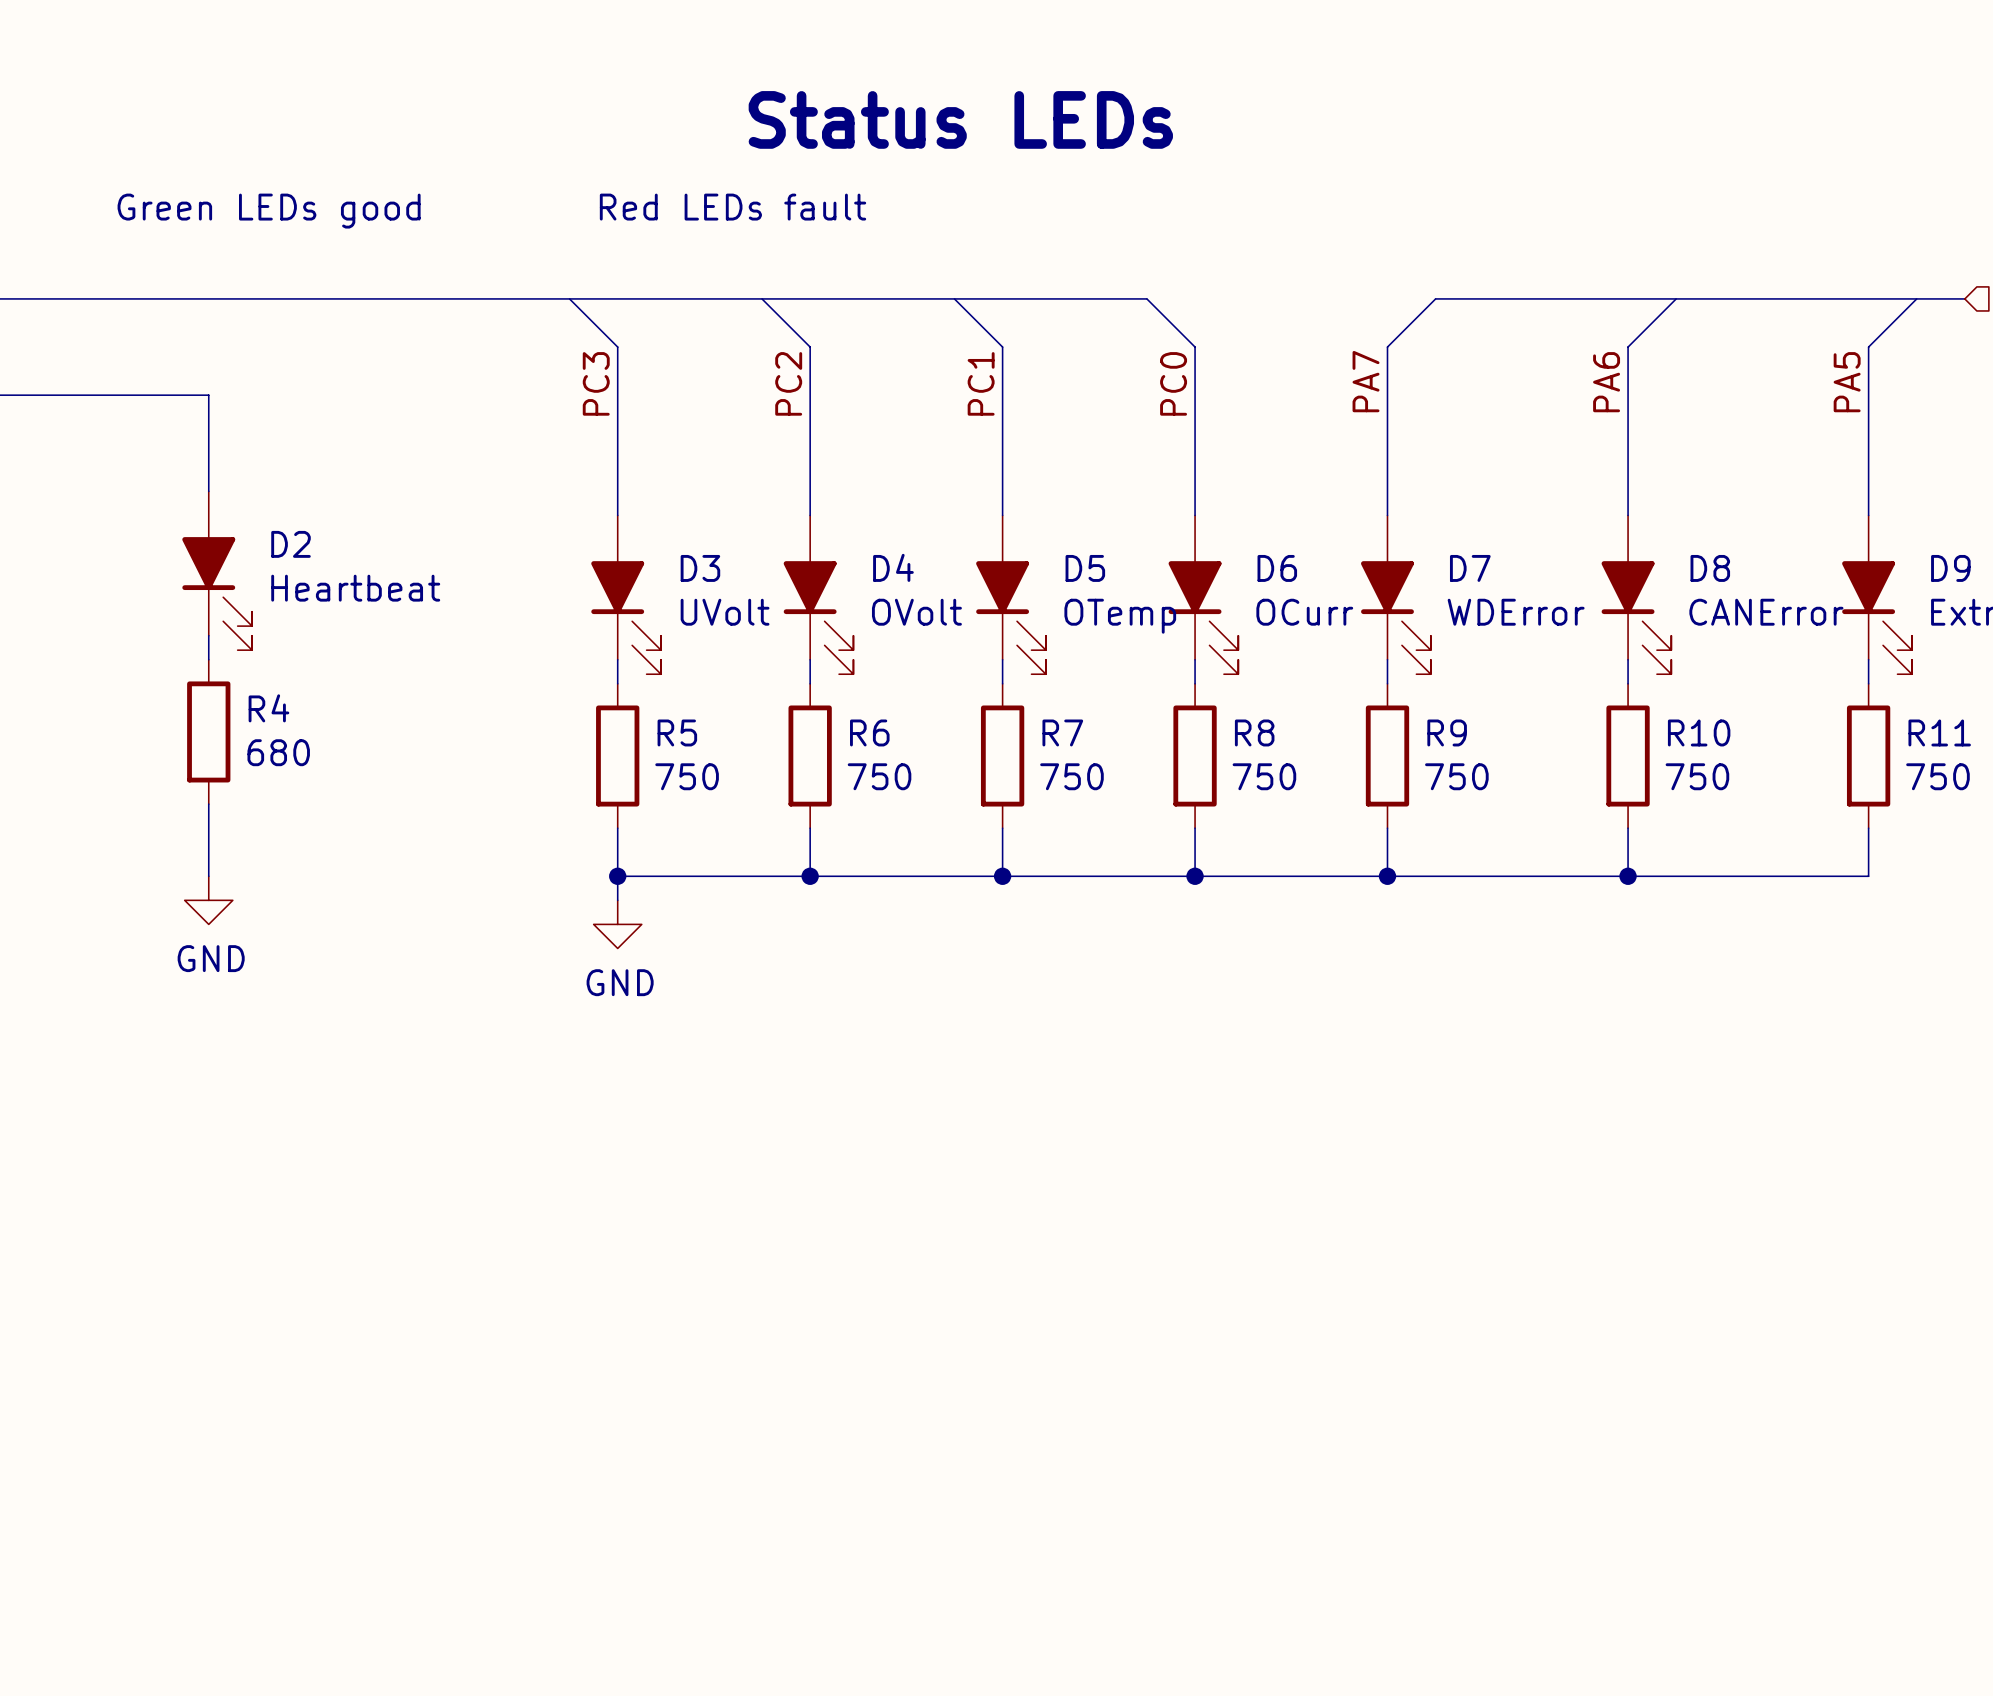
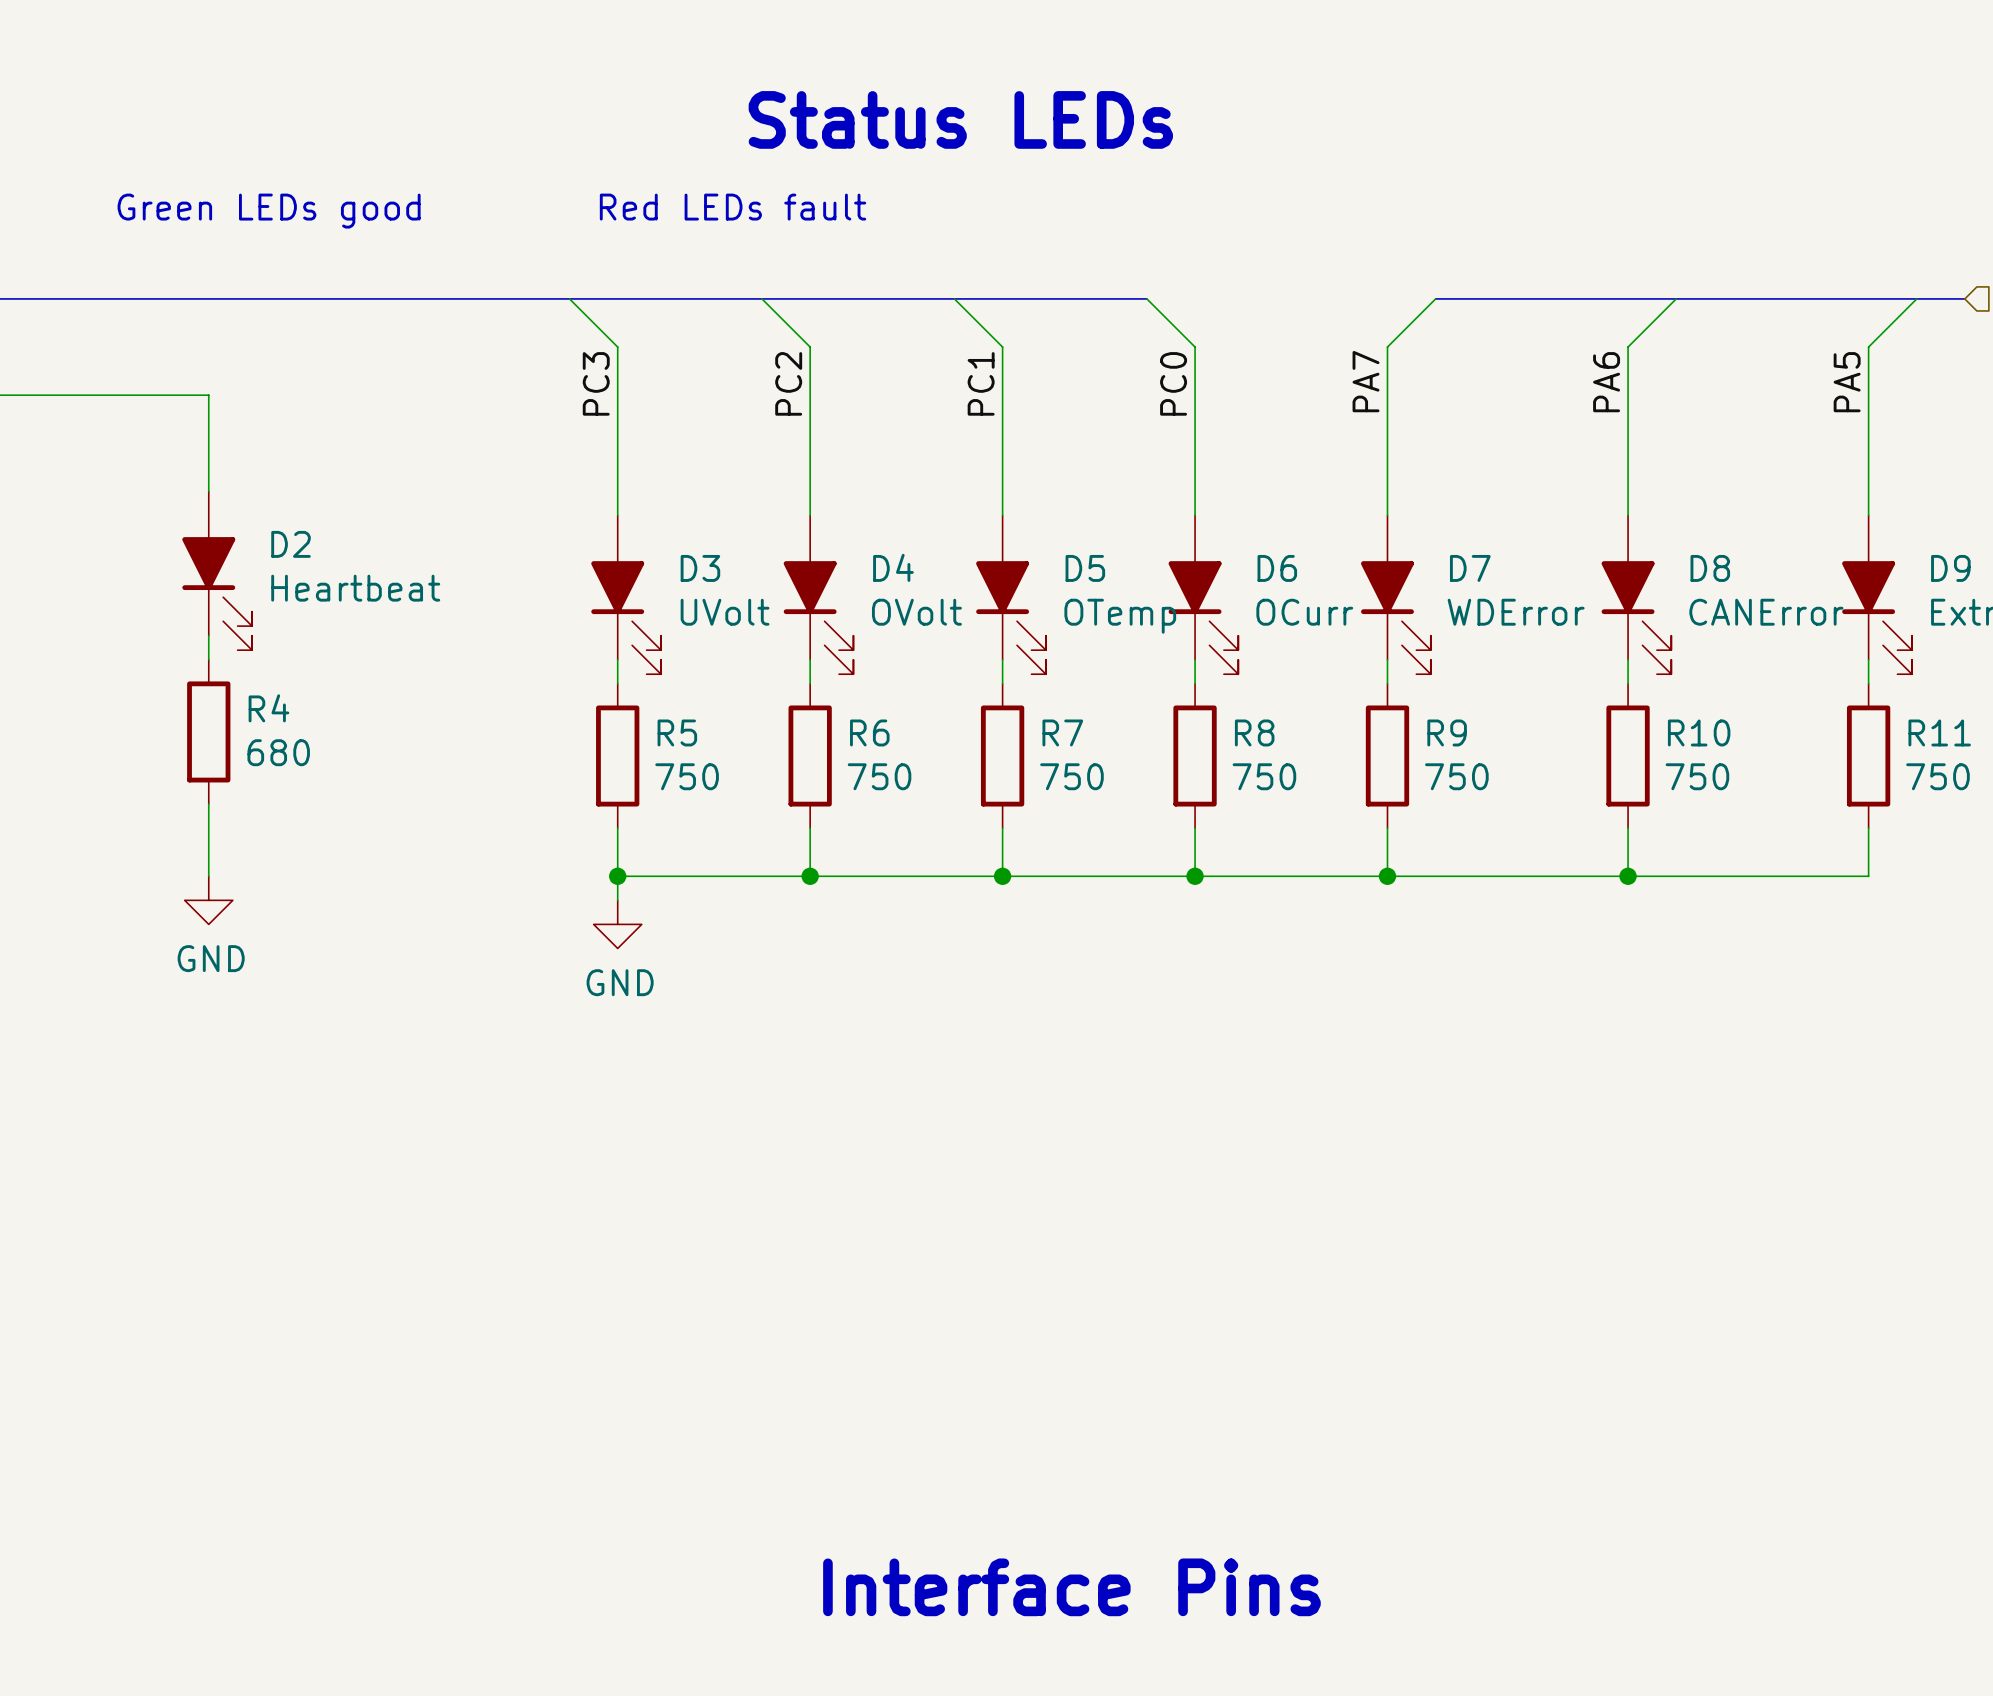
text: none -> Interface Pins (1071, 1587)

